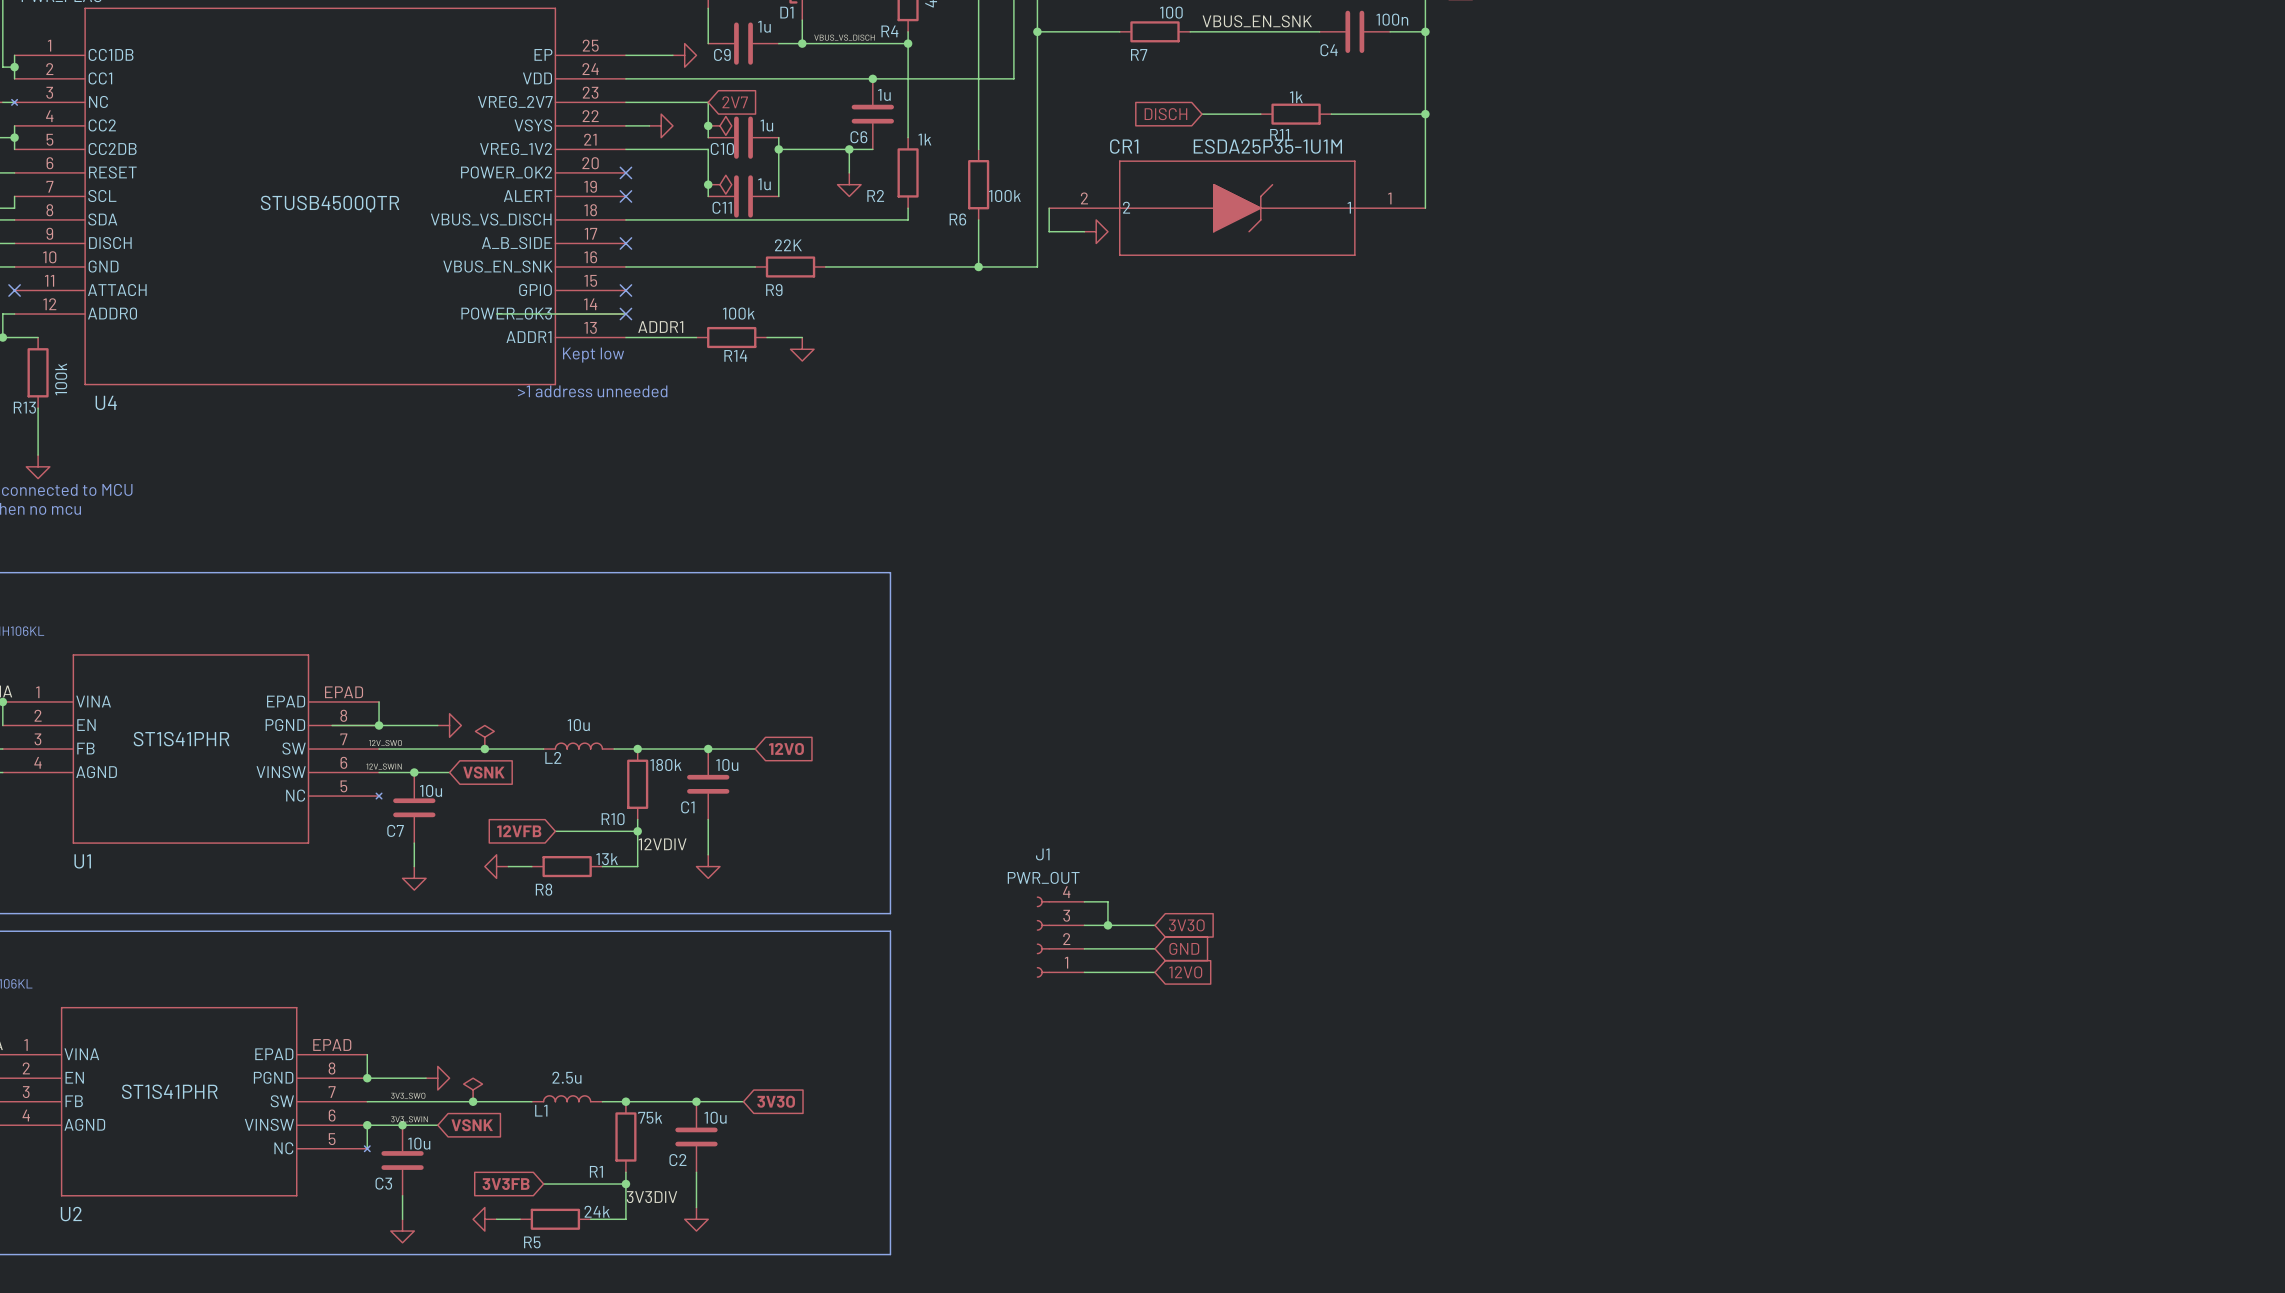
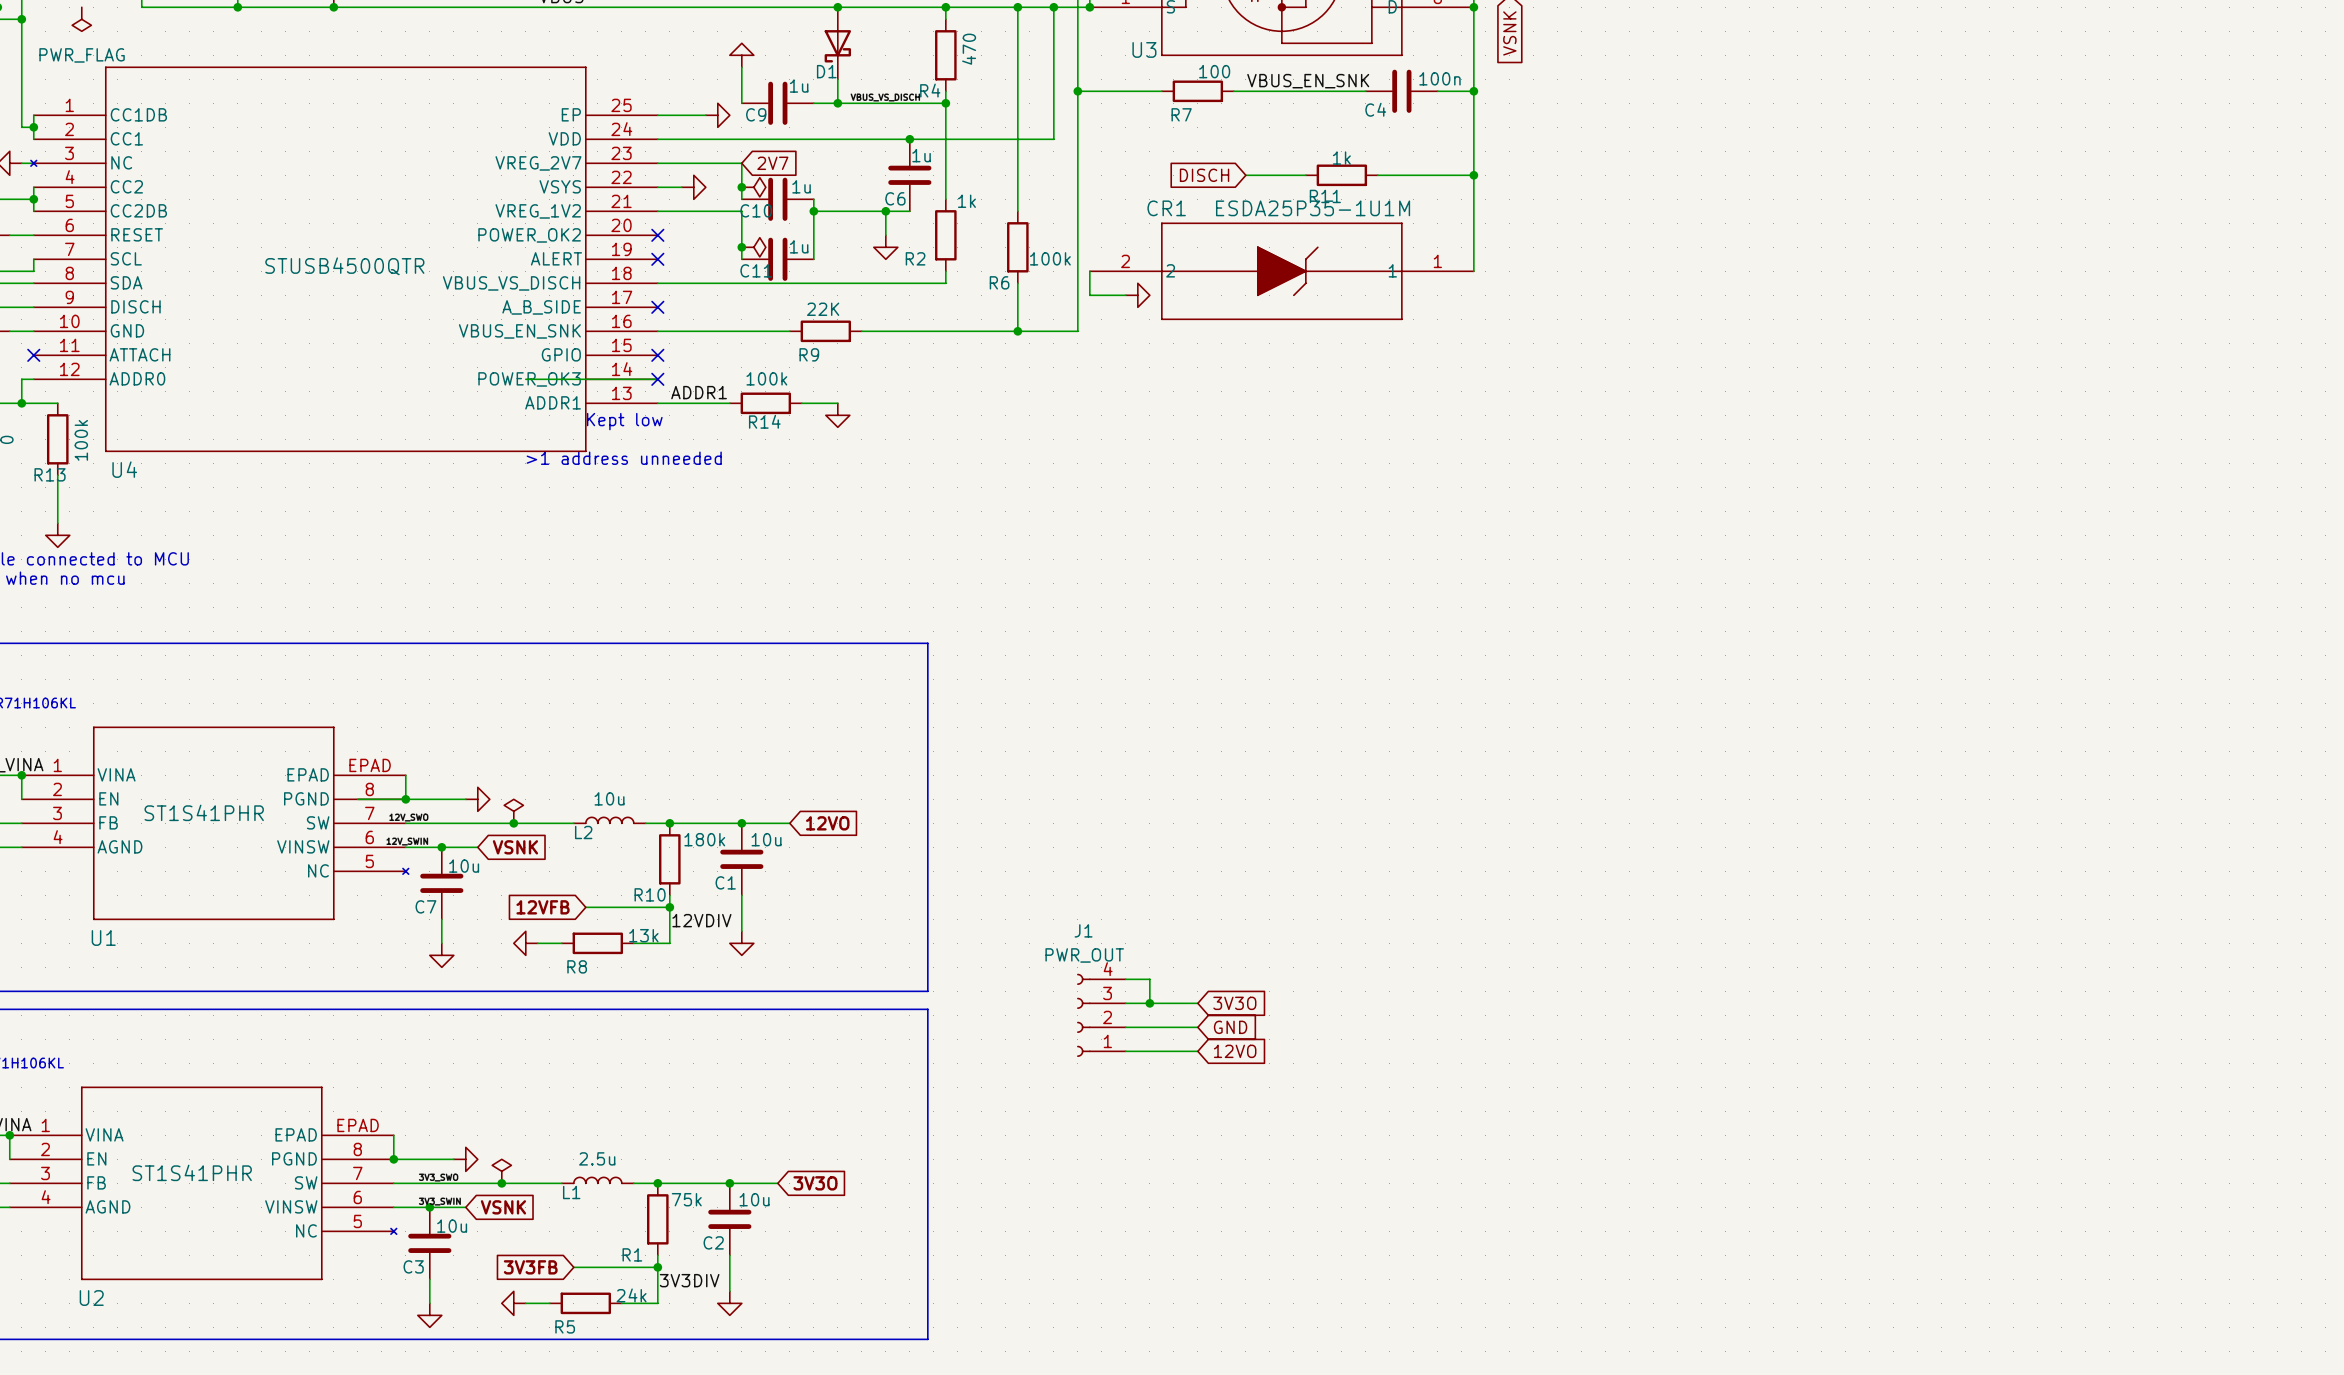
wire: (367, 1125) (367, 1148) -> none
junction: (367, 1125) -> none

